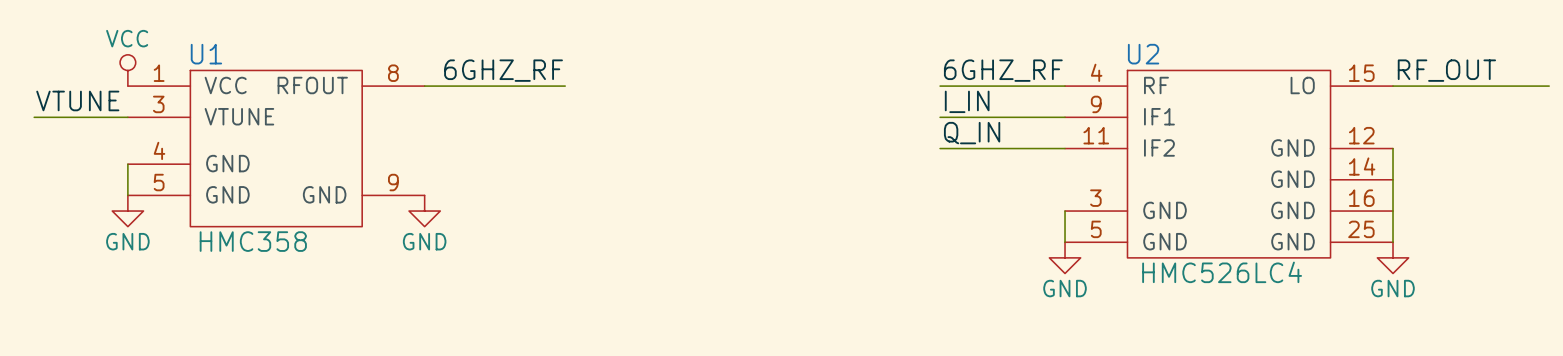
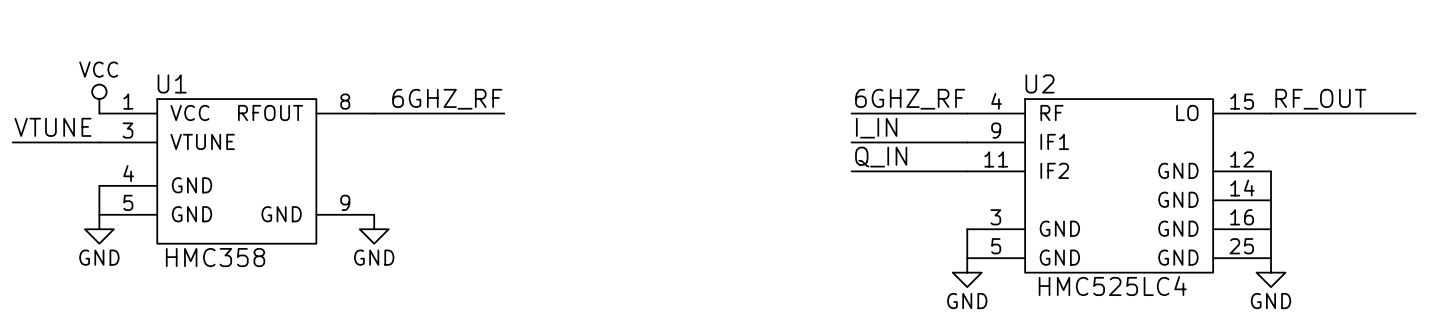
U2 value: HMC526LC4 (1222, 272) -> HMC525LC4 (1112, 286)

